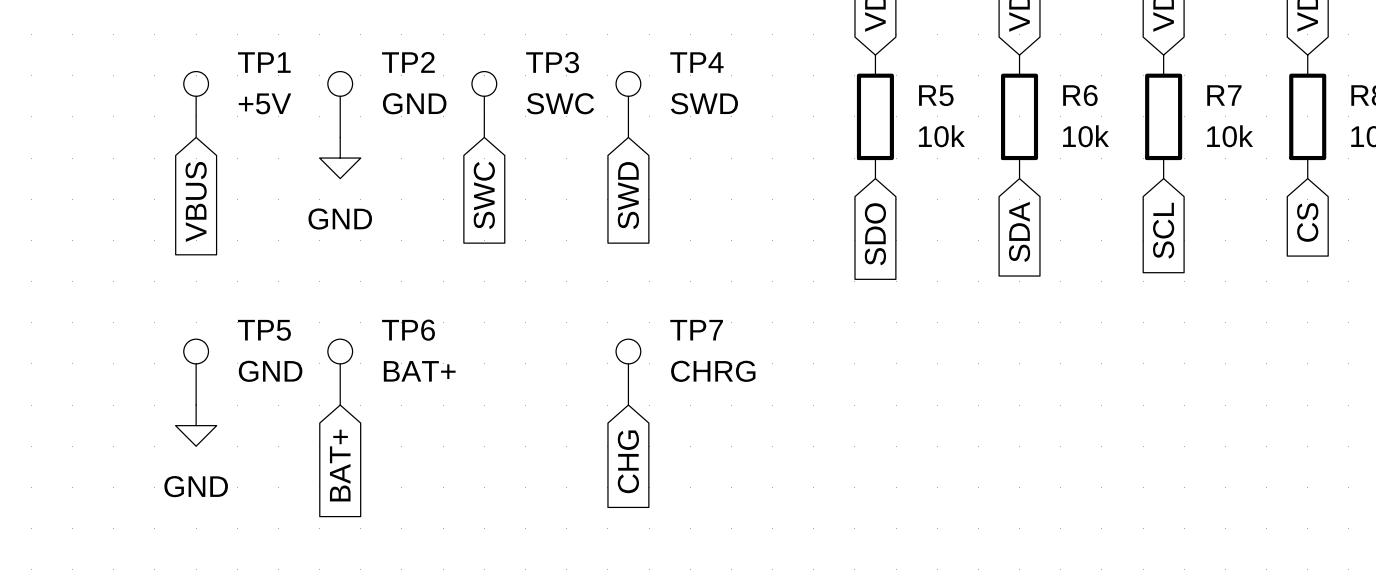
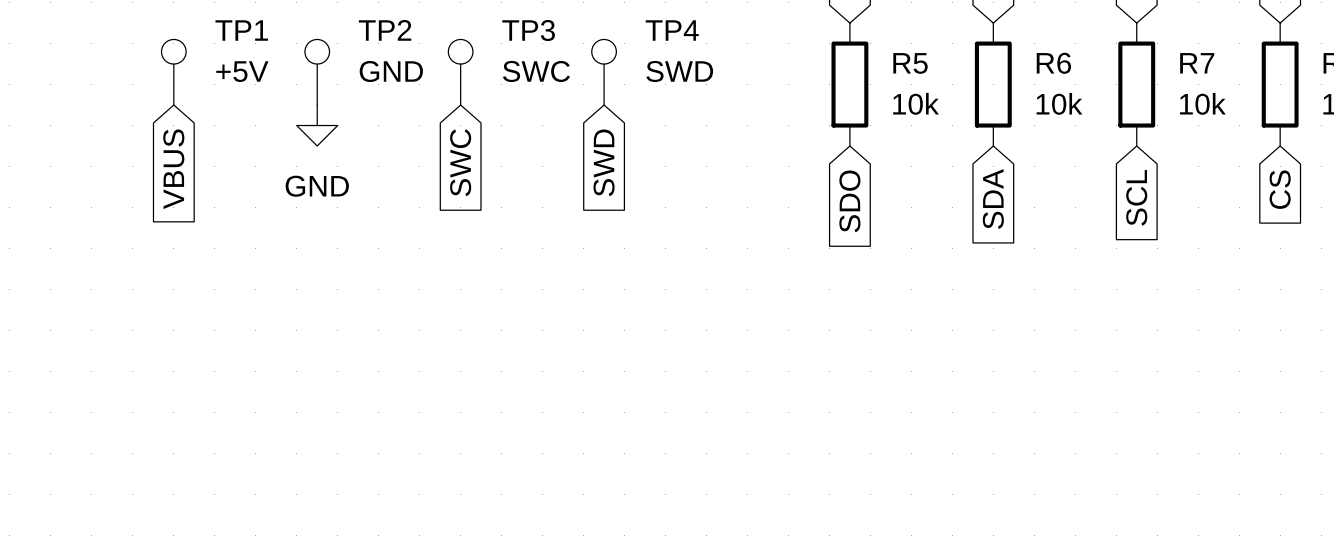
TP5: GND (196, 372) -> none
TP6: BAT+ (340, 372) -> none
TP7: CHRG (628, 372) -> none
power symbol: GND (196, 425) -> none
global label: CHG (628, 461) -> none
global label: BAT+ (340, 465) -> none

